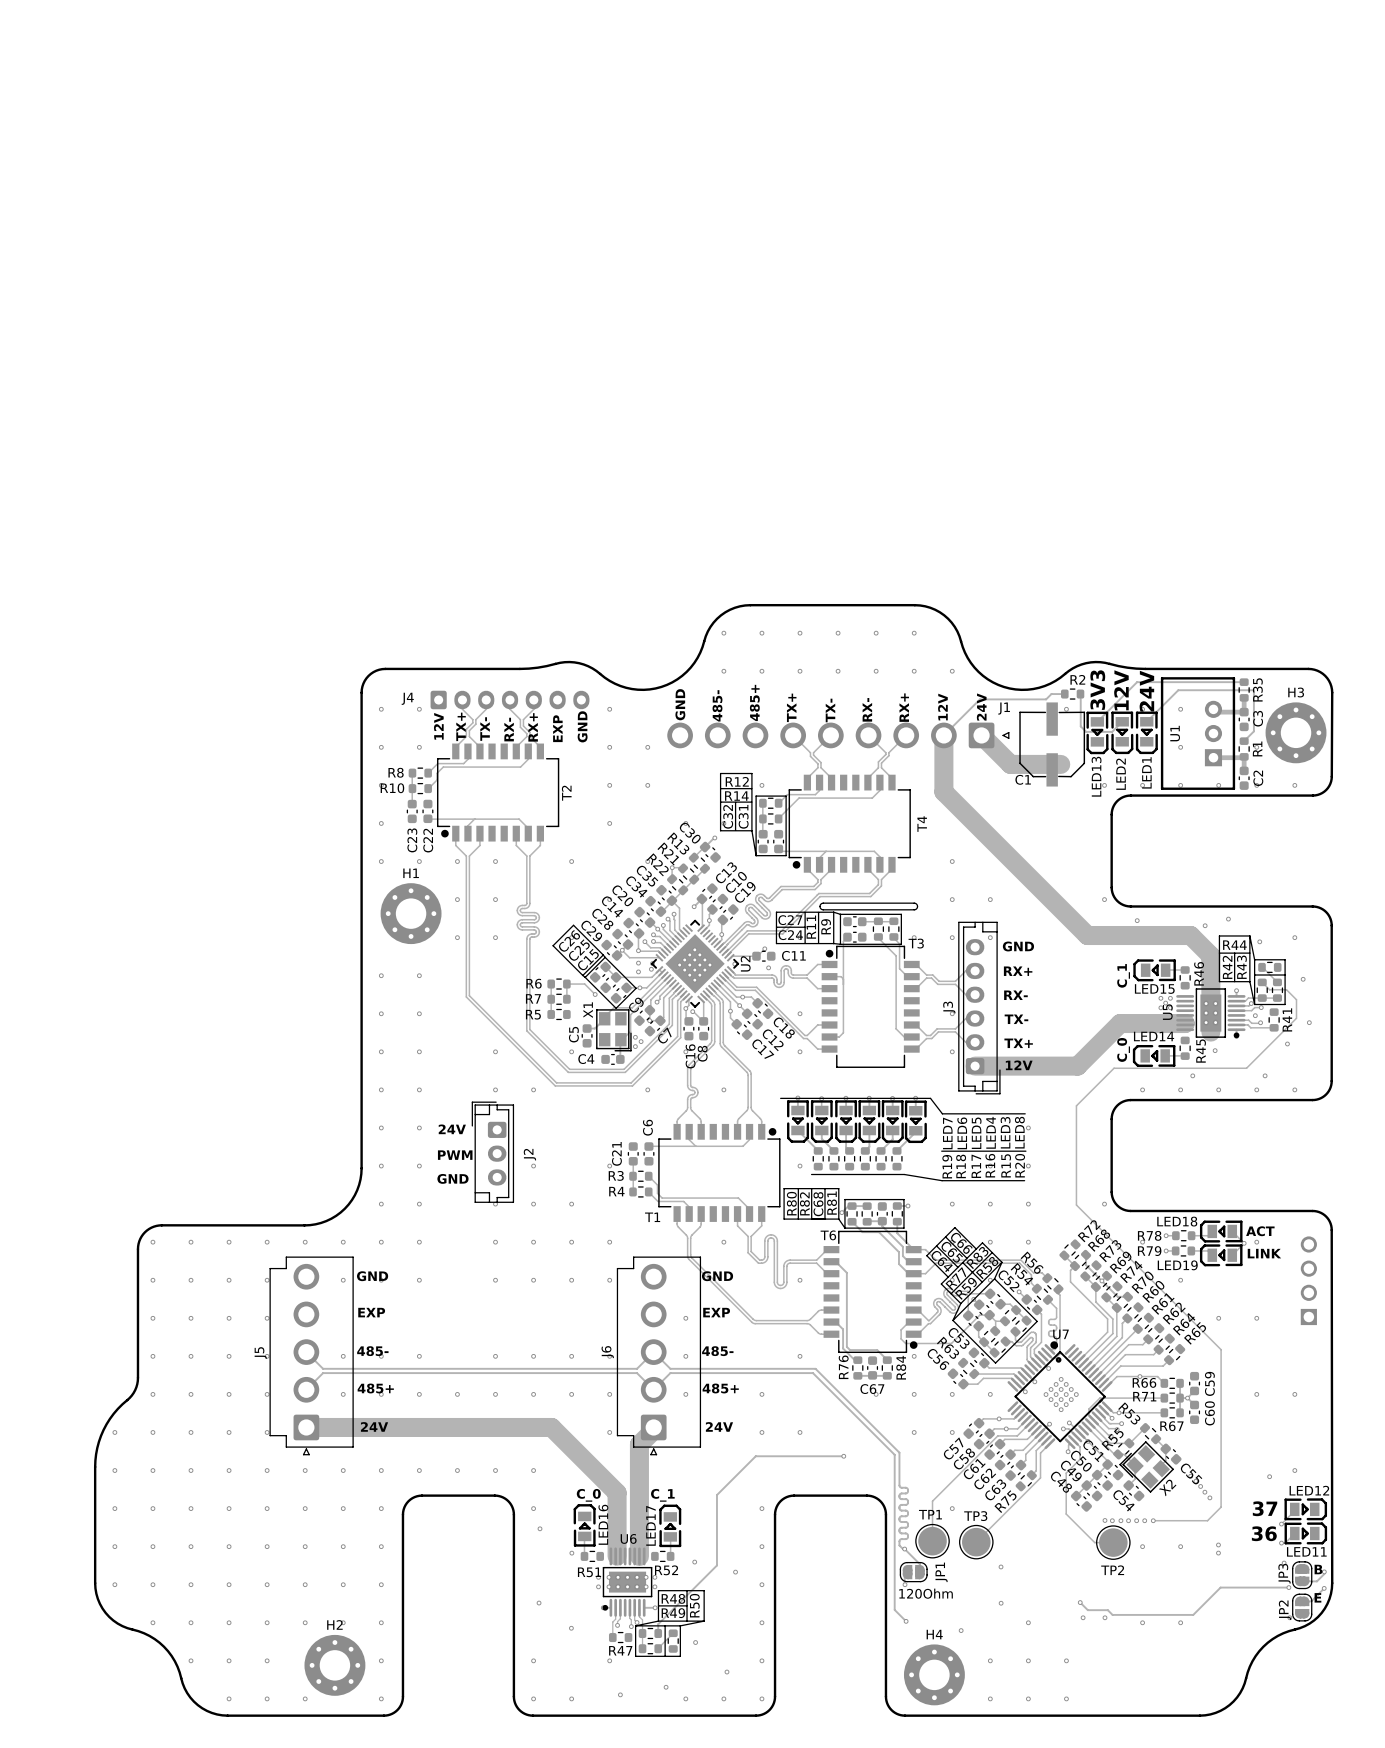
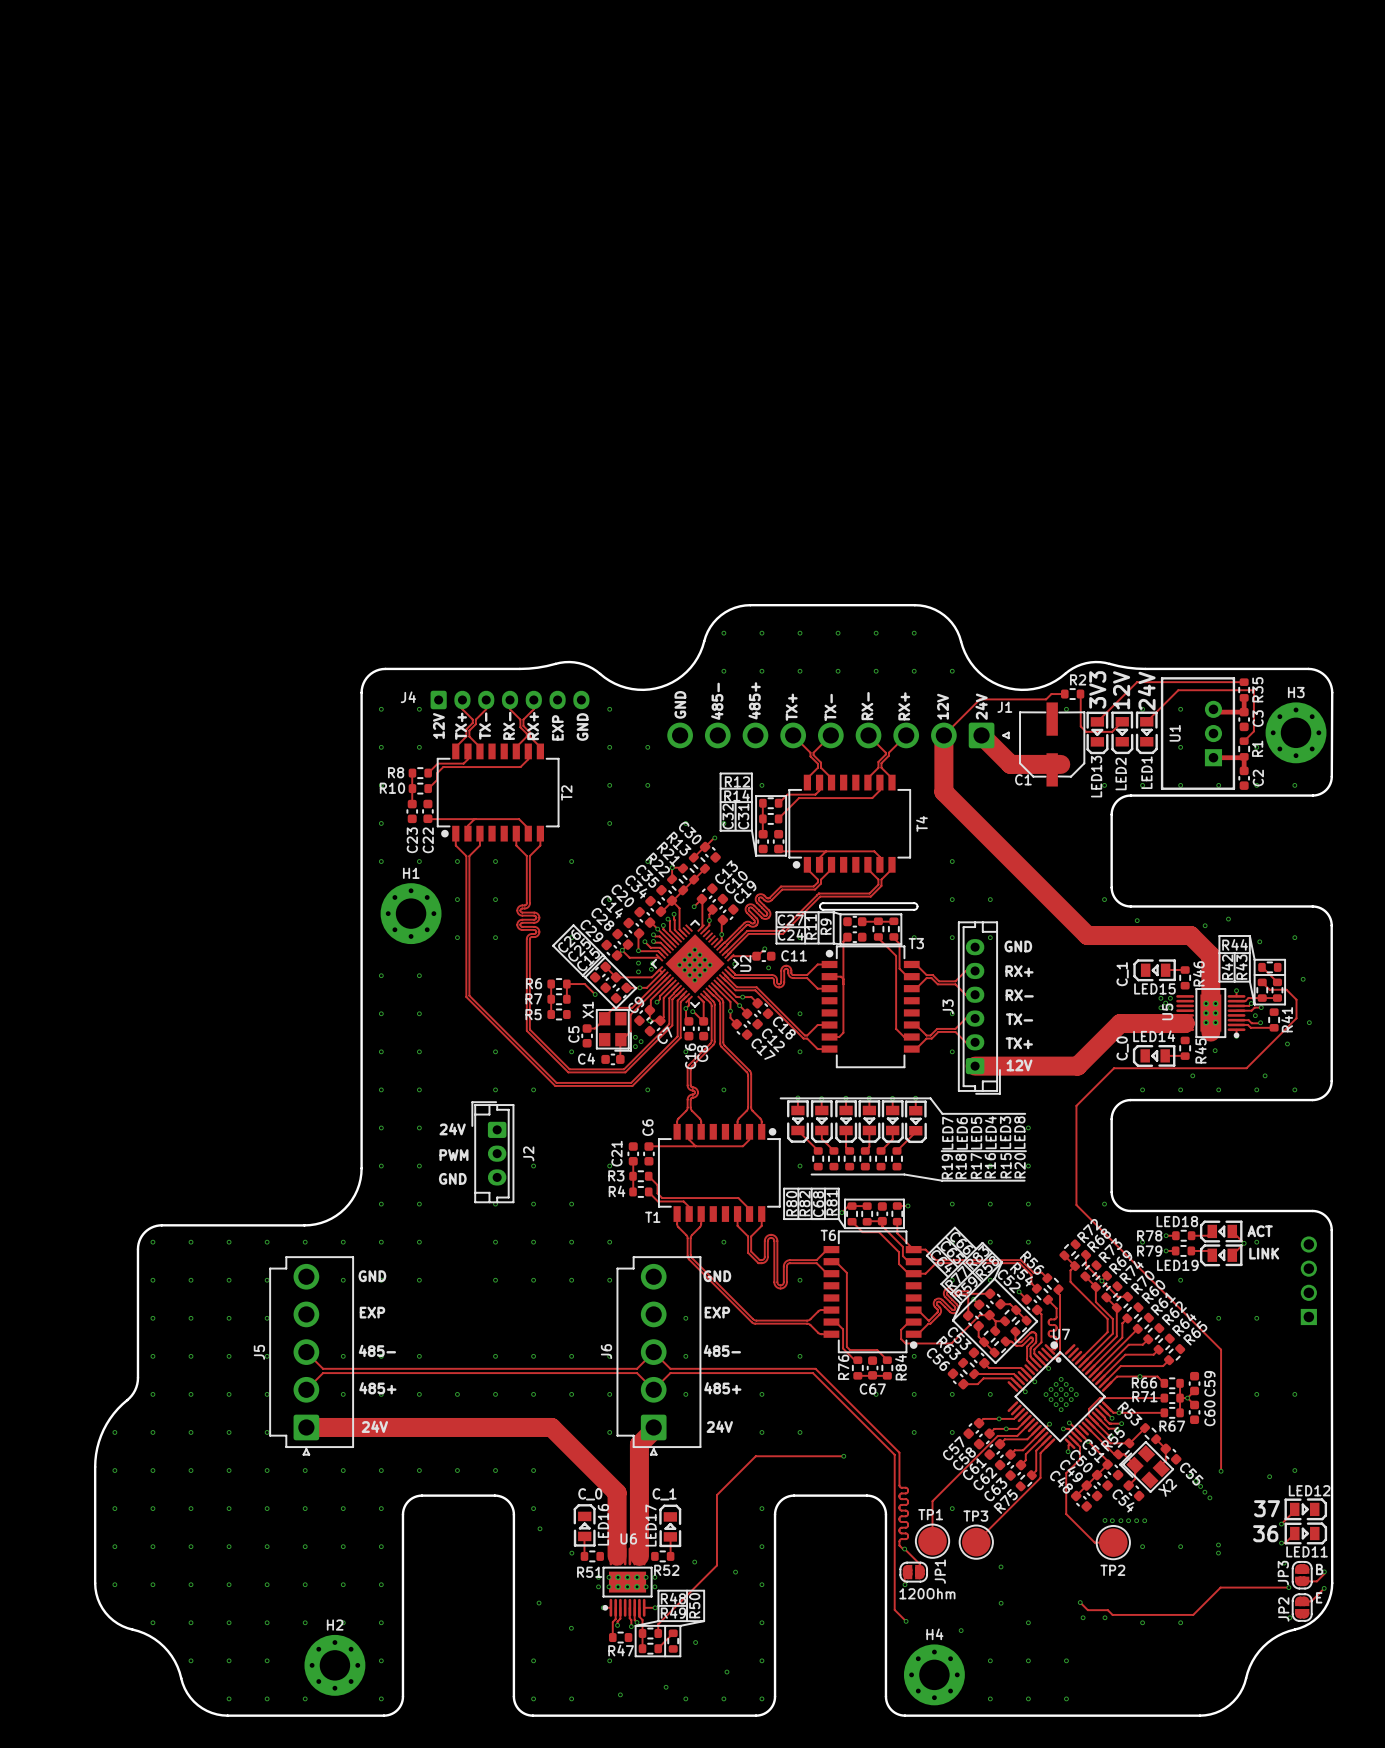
track: (1221, 1471) (1221, 1507) (1207, 1520) (1153, 1520) -> none
via: none -> (1221, 1471)
via: (1153, 1520) -> none

